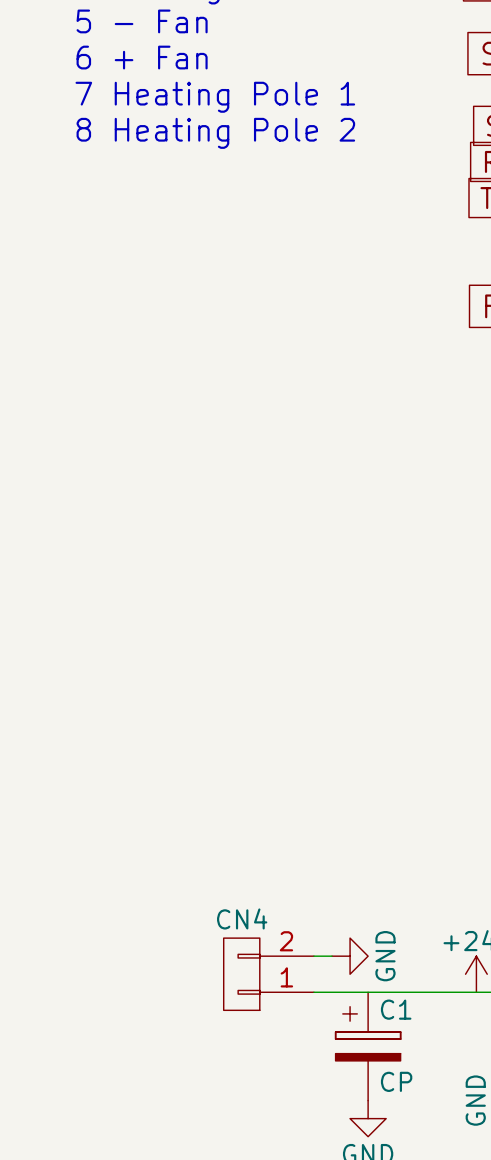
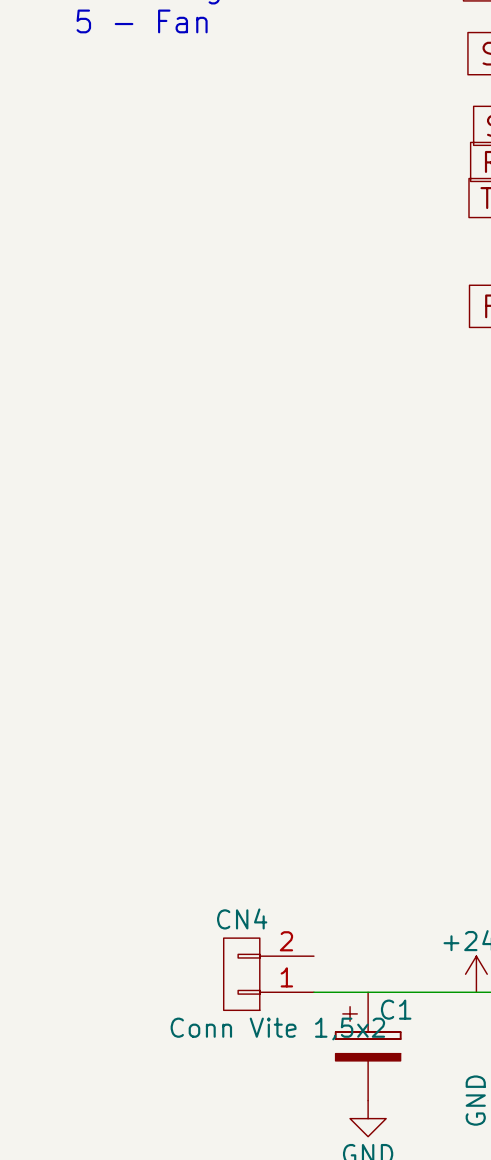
text: 6 + Fan (142, 57) -> none
text: 7 Heating Pole 1 (215, 97) -> none
text: 8 Heating Pole 2 (215, 133) -> none
wire: (313, 956) (332, 956) -> none
power symbol: GND (350, 956) -> none
CN4 value: none -> Conn Vite 1,5x2 (277, 1028)
C1 value: CP (396, 1081) -> none

